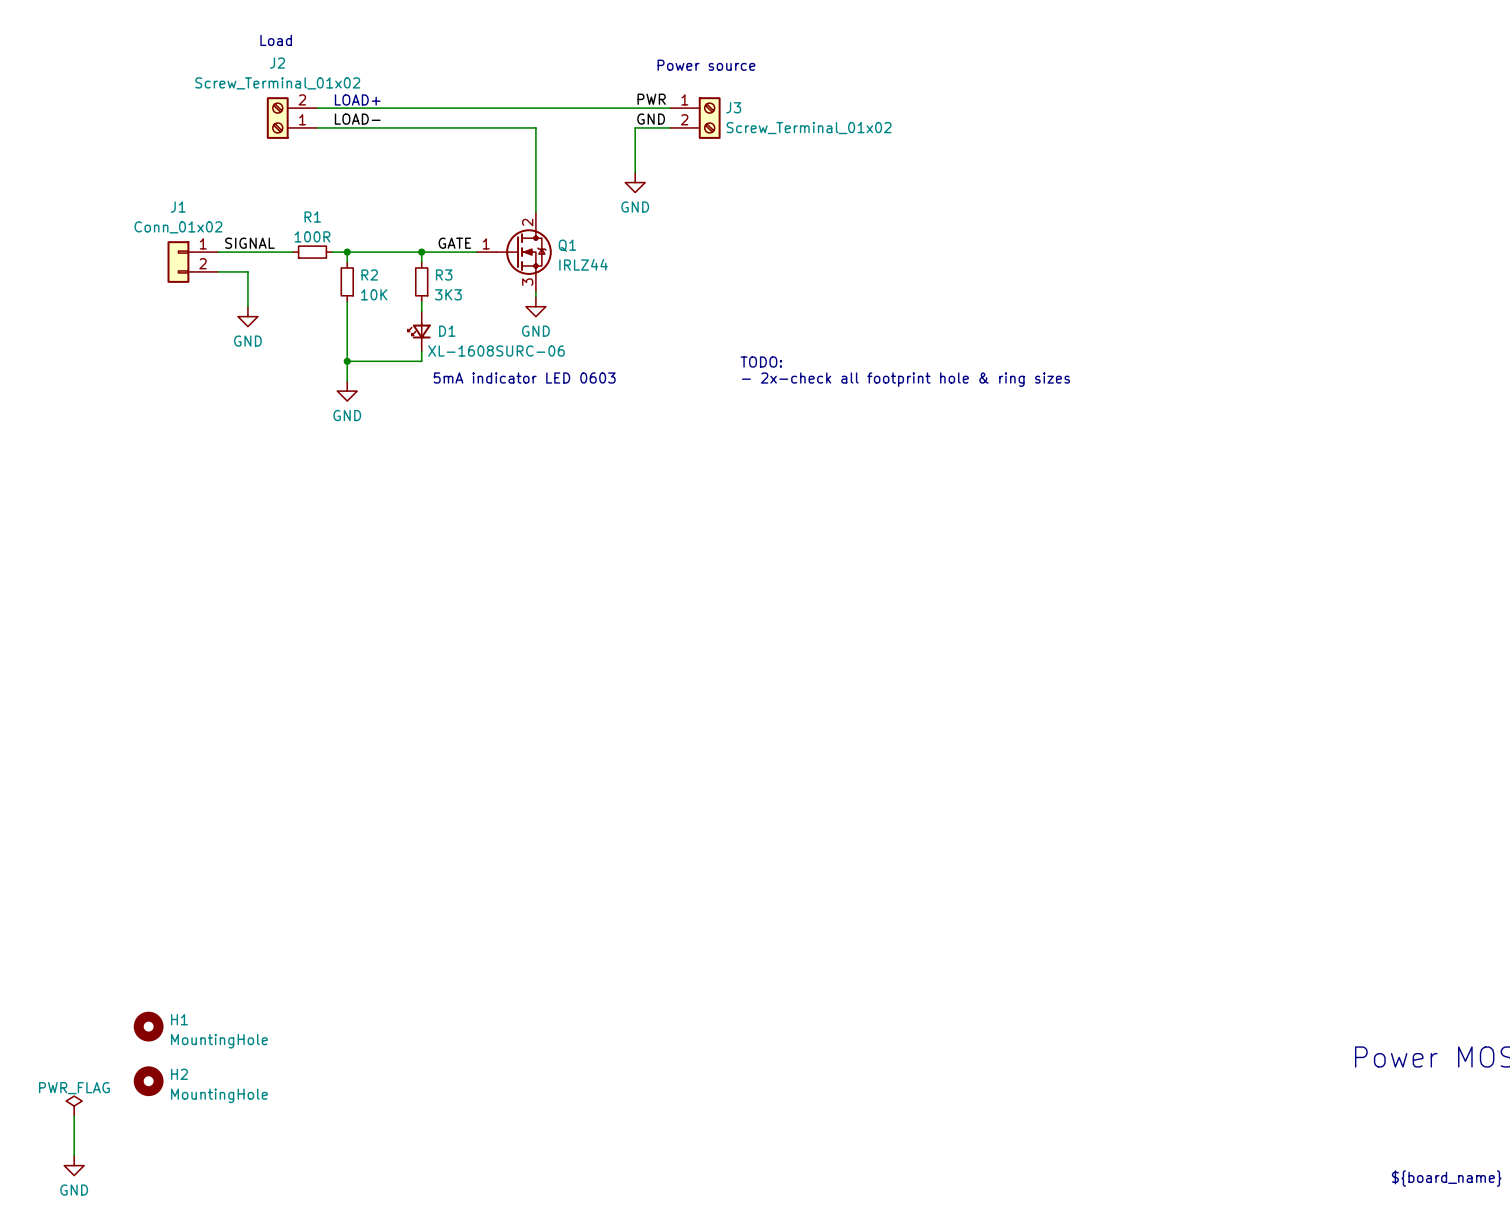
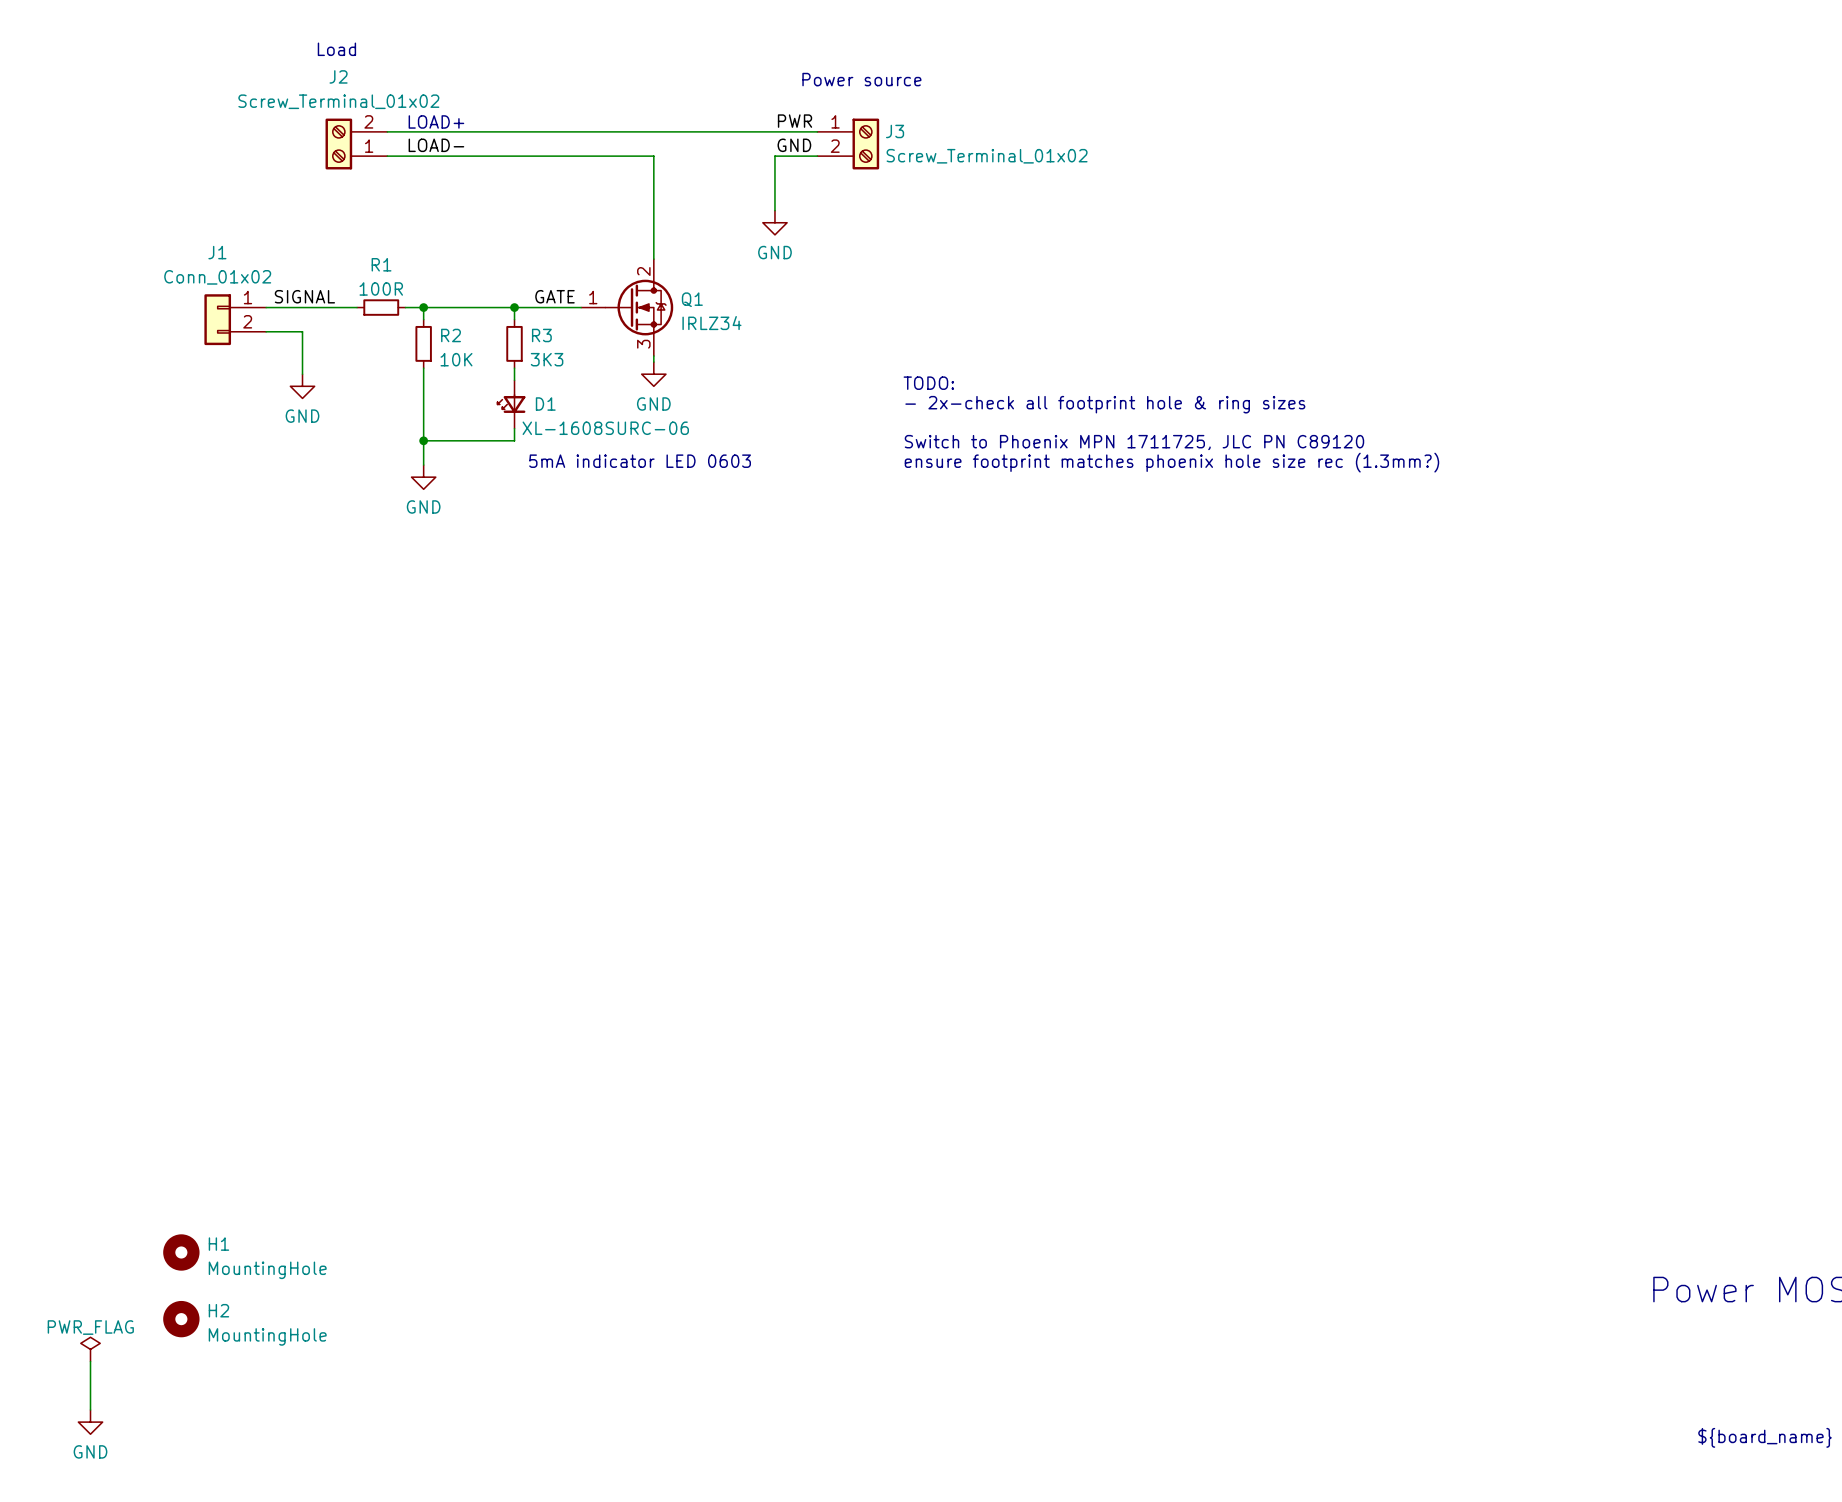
Q1 value: IRLZ44 (583, 264) -> IRLZ34 (711, 323)
text: none -> TODO: (928, 383)
text: none -> - 2x-check all footprint hole & ring sizes (1105, 404)
text: TODO: (761, 362) -> Switch to Phoenix MPN 1711725, JLC PN C89120 (1134, 442)
text: - 2x-check all footprint hole & ring sizes (905, 379) -> ensure footprint matches phoenix hole size rec (1.3mm?) (1171, 462)

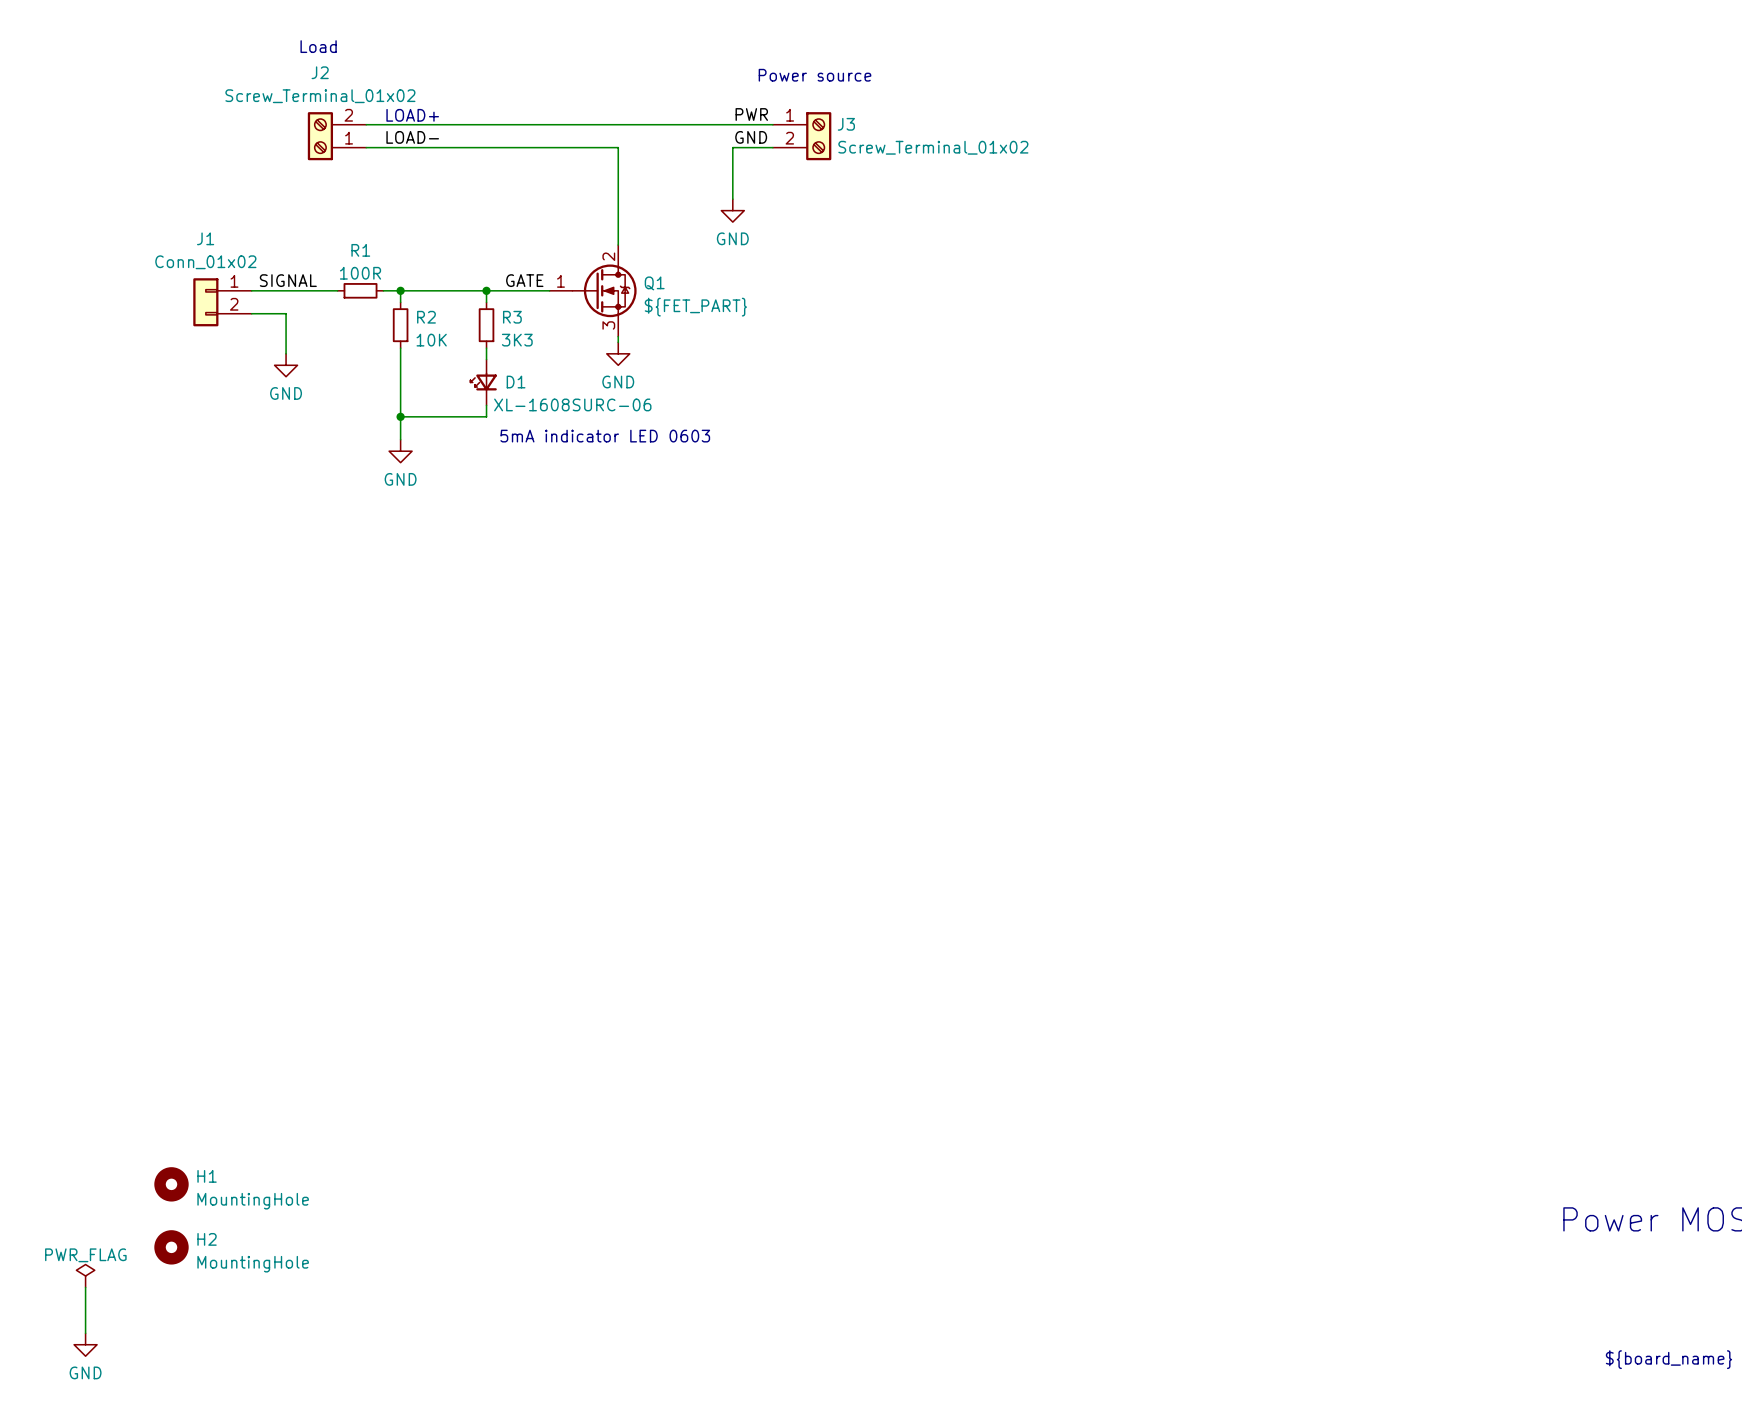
Q1 value: IRLZ34 (711, 323) -> ${FET_PART} (695, 307)
text: TODO: (928, 383) -> none
text: - 2x-check all footprint hole & ring sizes (1105, 404) -> none
text: Switch to Phoenix MPN 1711725, JLC PN C89120 (1134, 442) -> none
text: ensure footprint matches phoenix hole size rec (1.3mm?) (1171, 462) -> none

